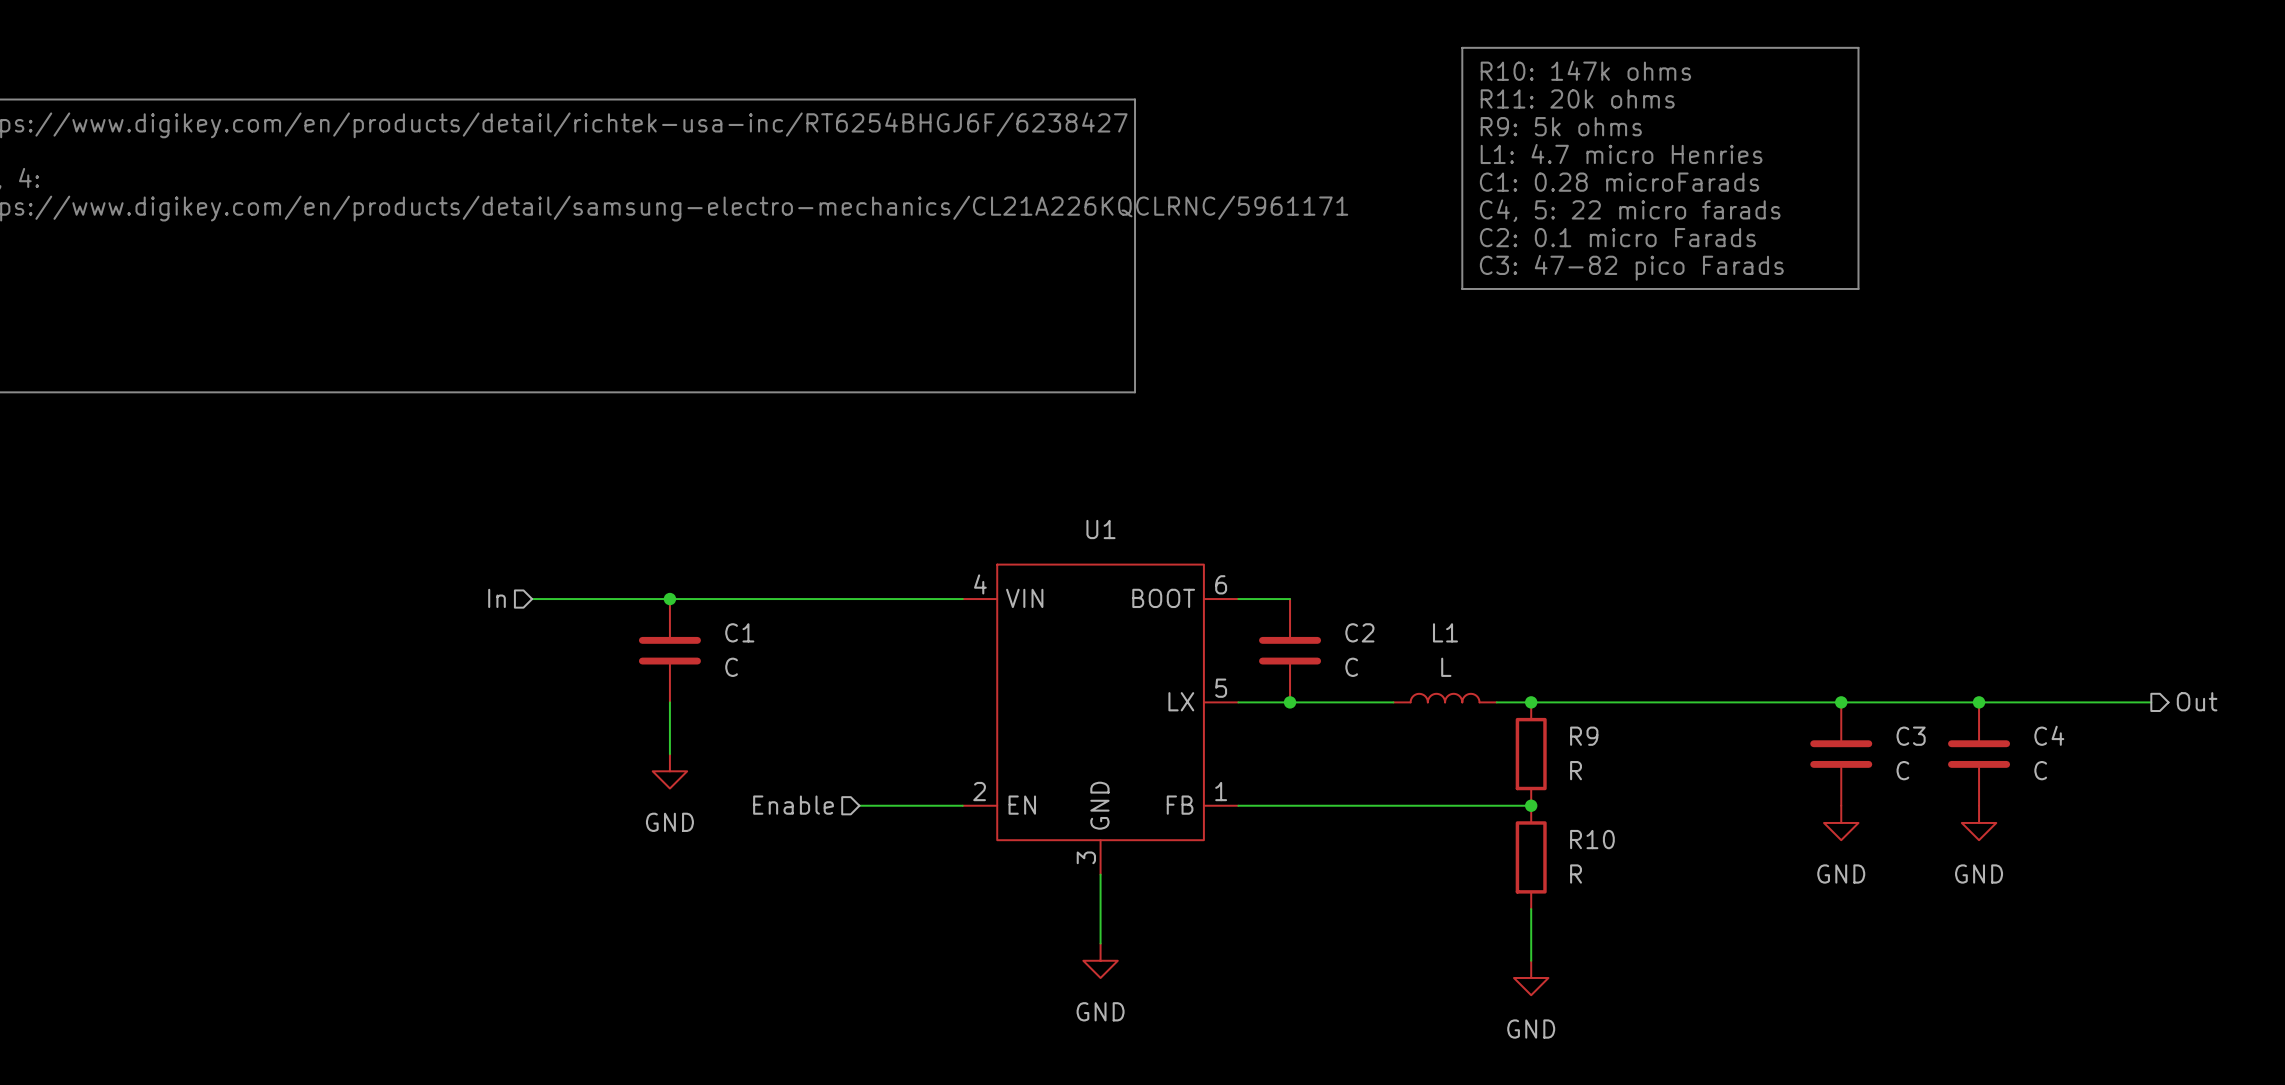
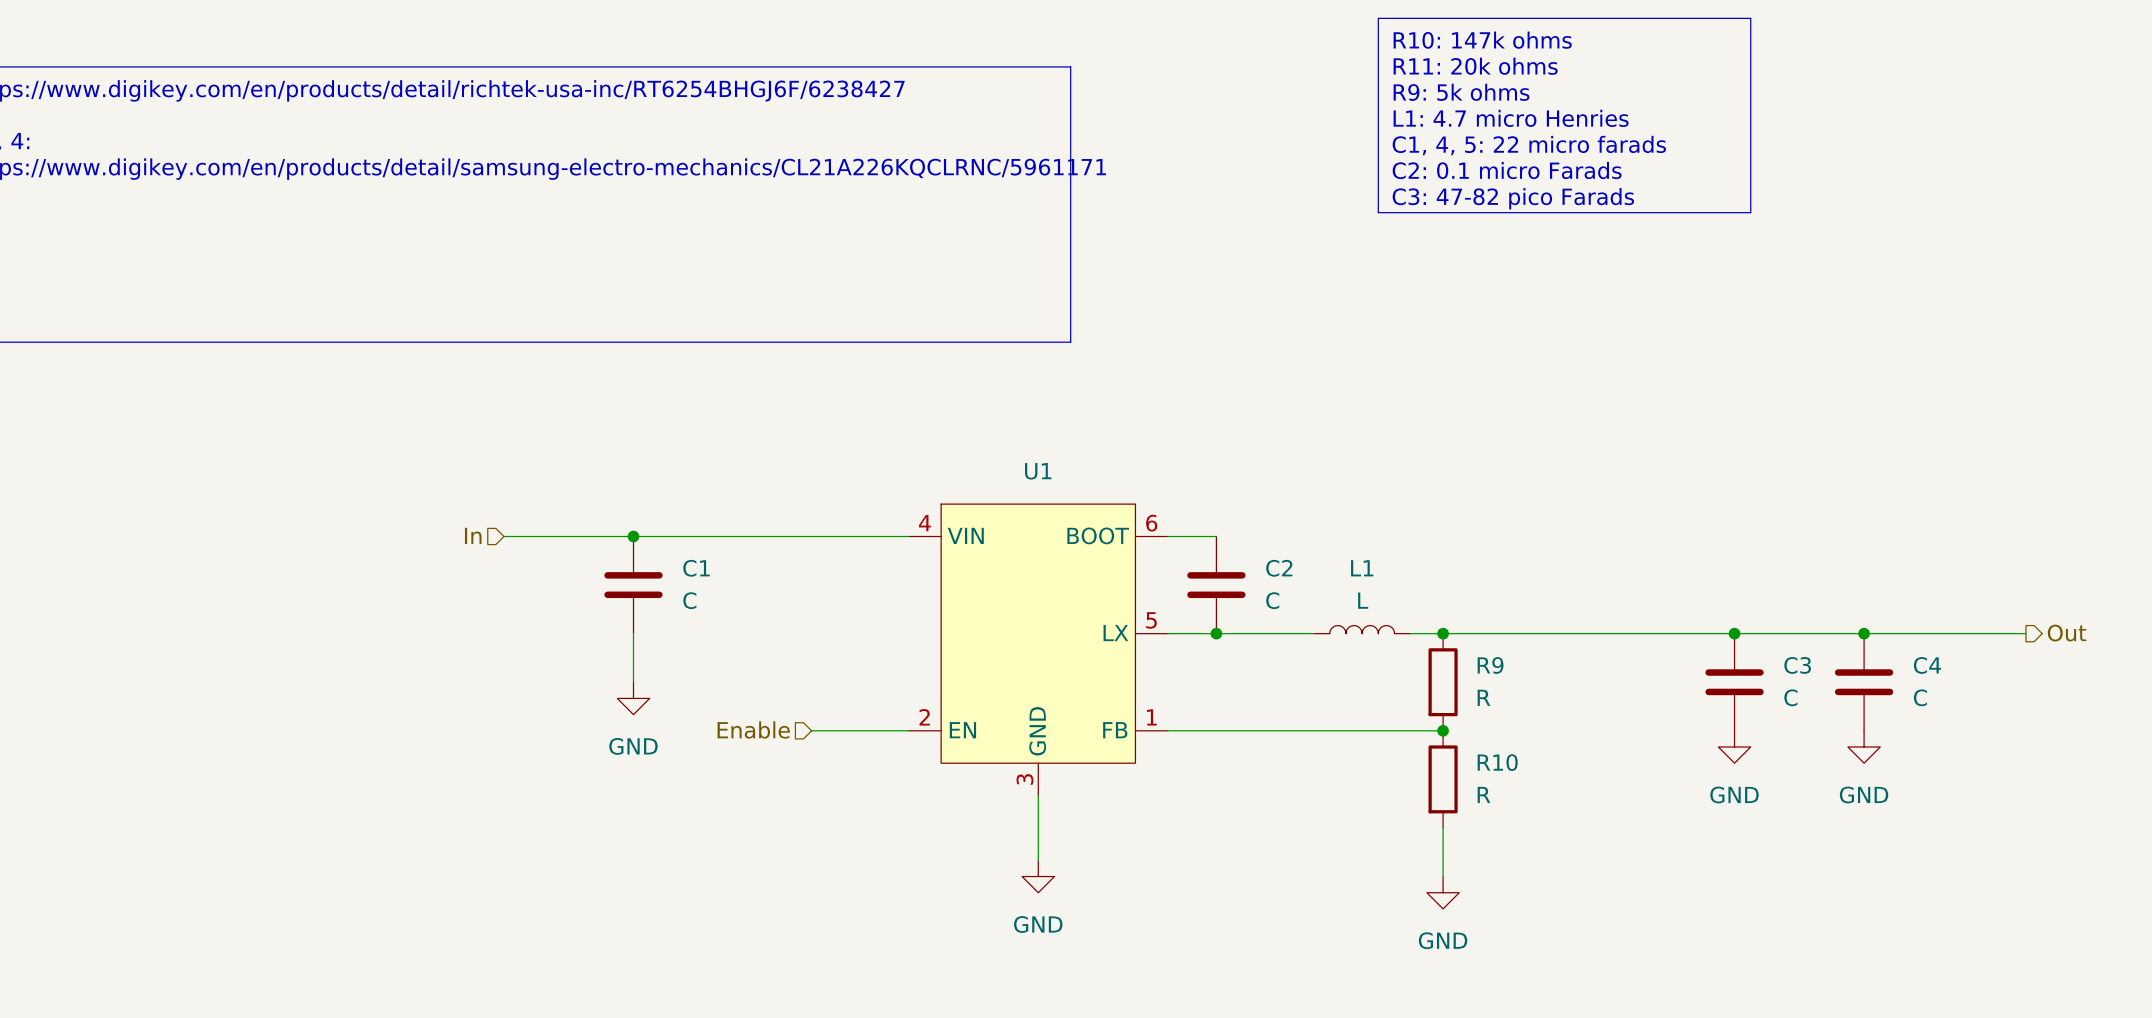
text: C1: 0.28 microFarads (1619, 182) -> C1, 4, 5: 22 micro farads (1529, 145)
text: C4, 5: 22 micro farads (1630, 210) -> C2: 0.1 micro Farads (1507, 170)
text: C2: 0.1 micro Farads (1617, 237) -> C3: 47-82 pico Farads (1513, 198)
line: (1462, 254) (1462, 288) (1858, 288) (1858, 254) -> (1378, 212) (1750, 212)
text: C3: 47-82 pico Farads (1631, 267) -> none

